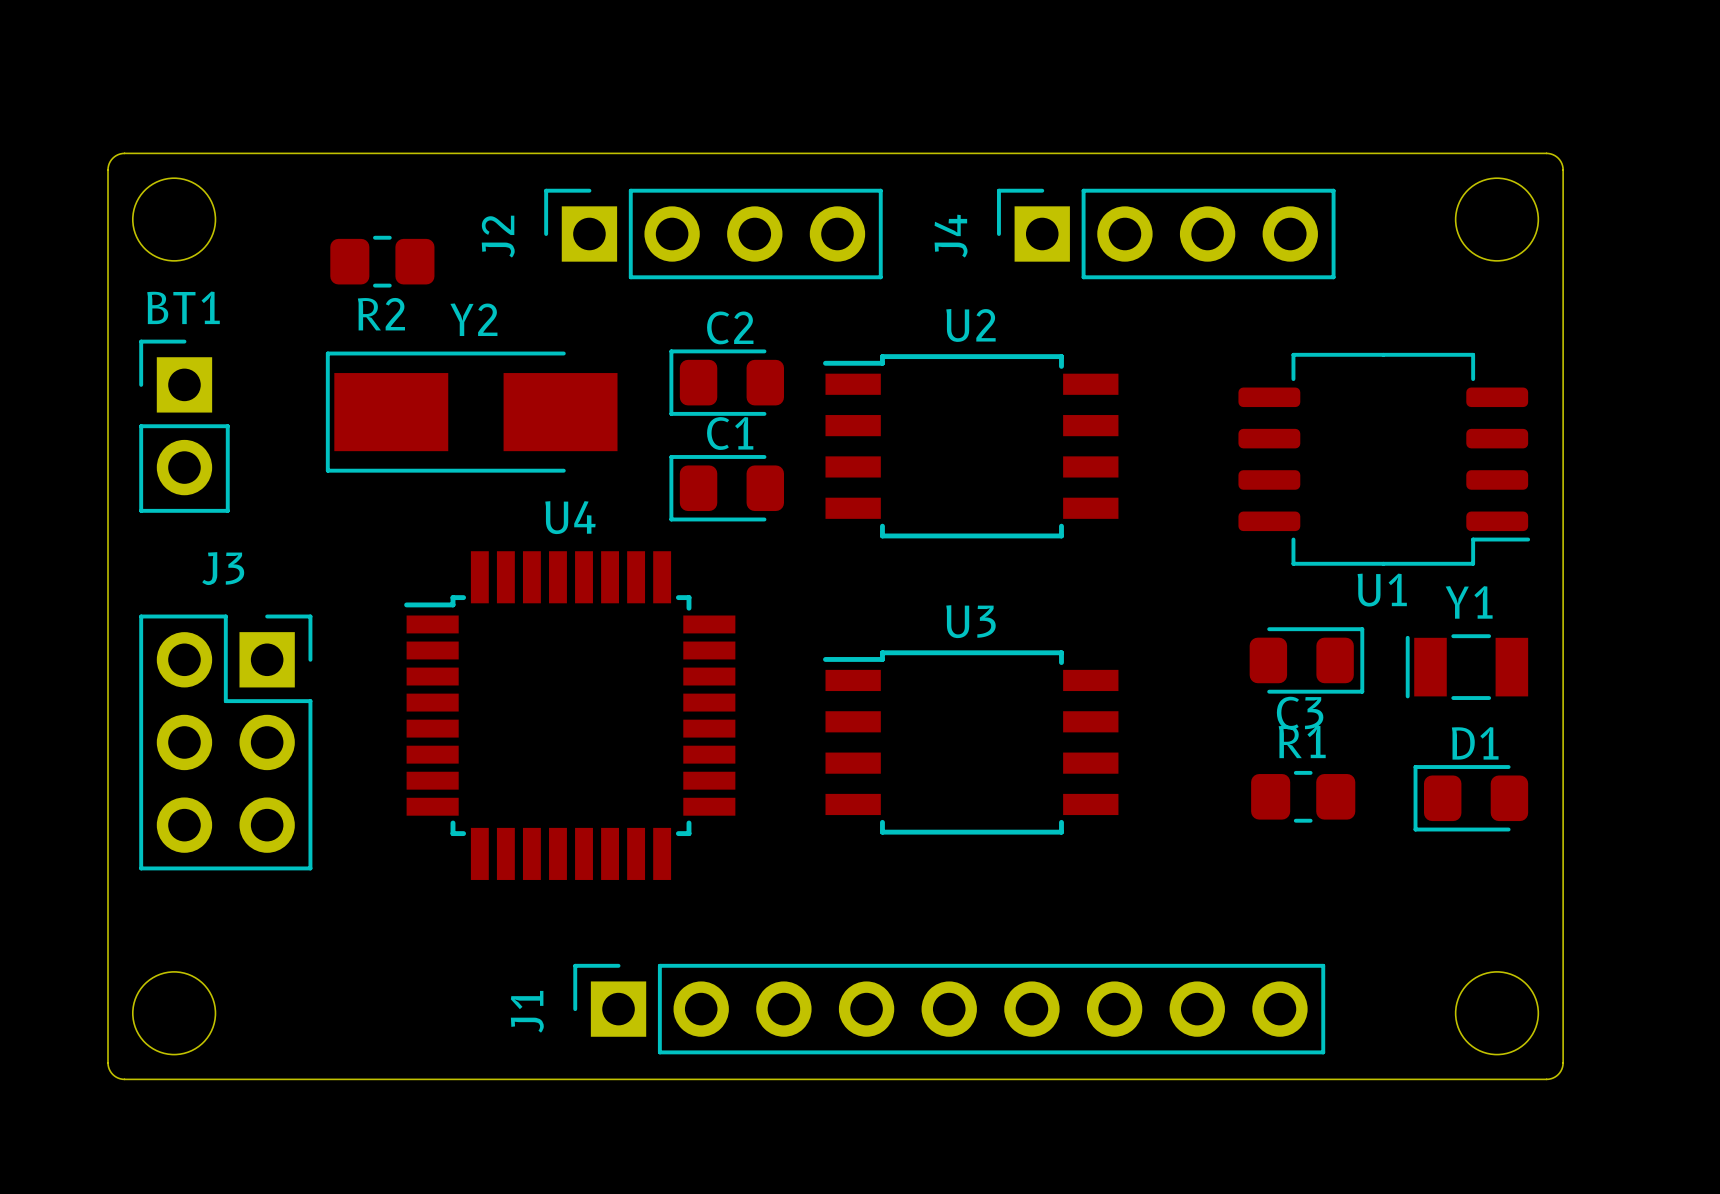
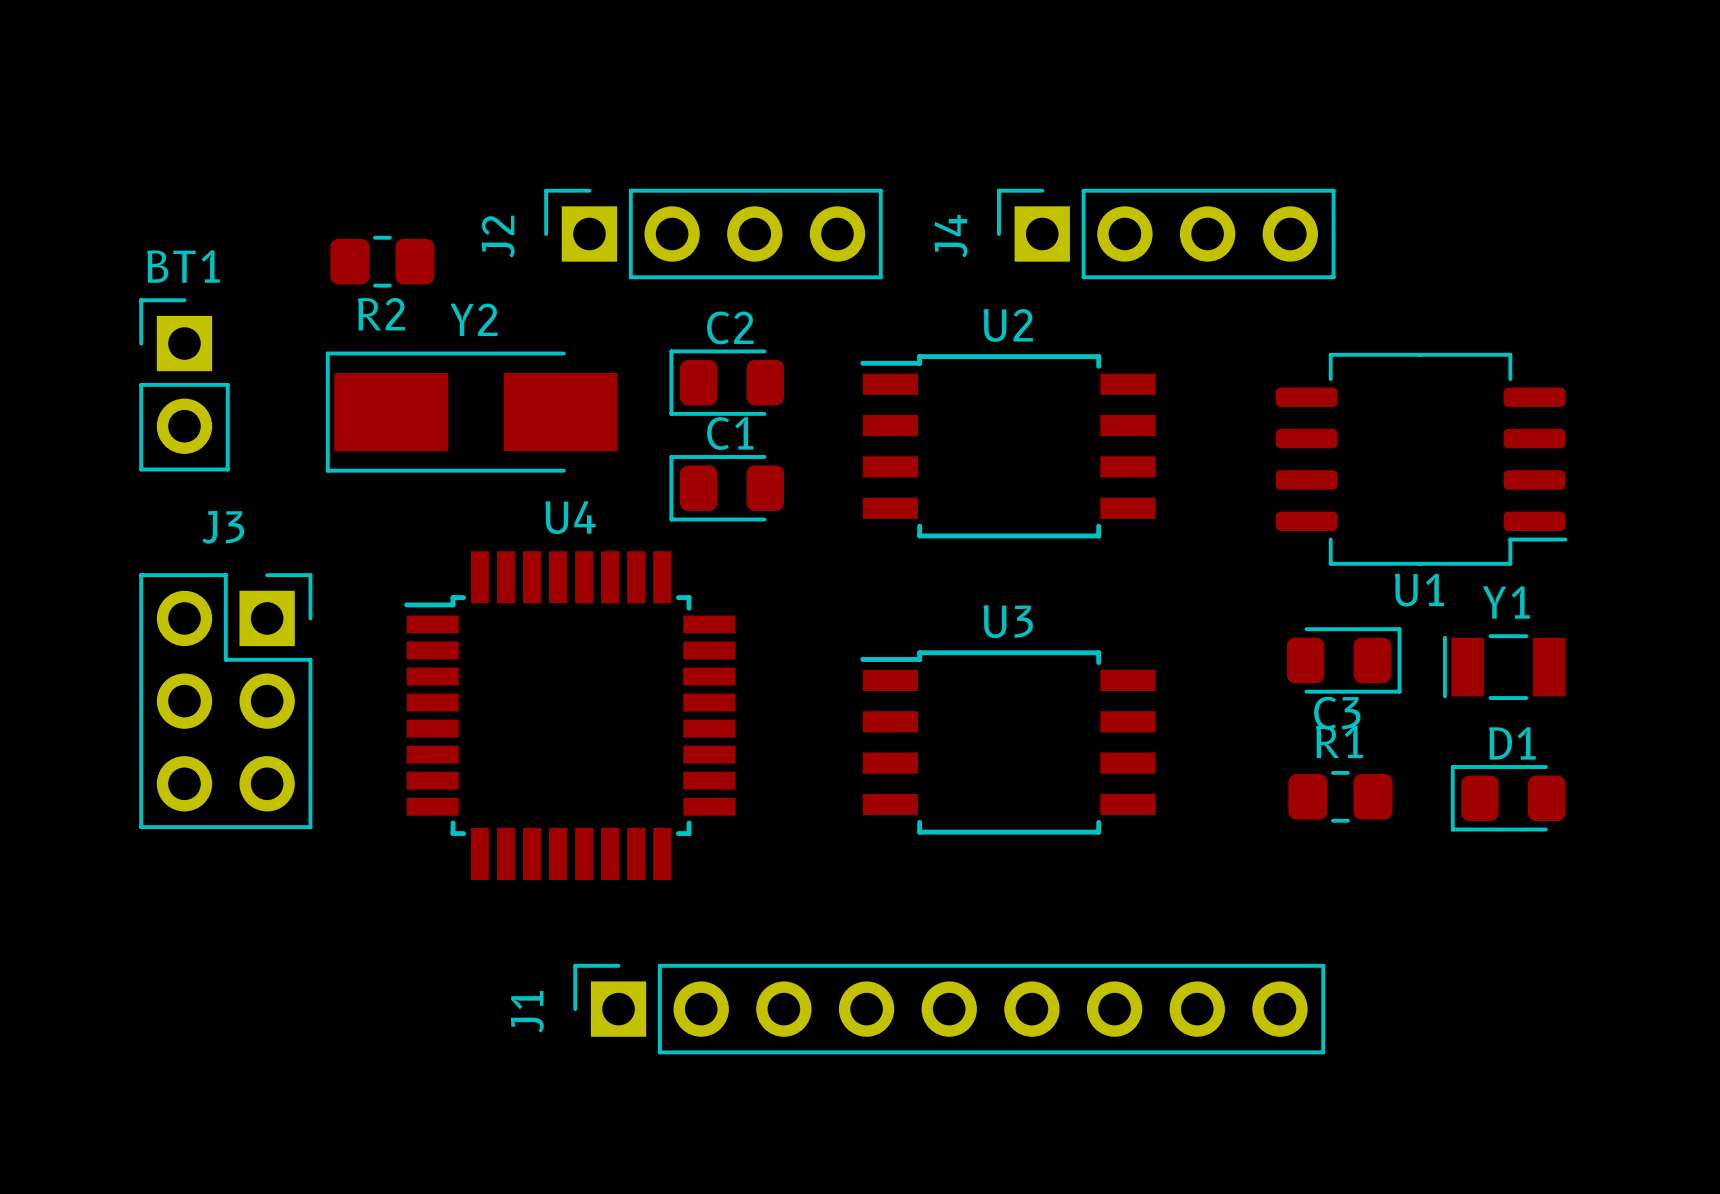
board edge: (124, 153) (1546, 153) (1554, 155) (1560, 161) (1563, 169) (1563, 1062) (1560, 1071) (1554, 1077) (1546, 1079) (124, 1079) (116, 1077) (110, 1071) (107, 1062) (107, 169) (112, 158) (124, 153) -> none
round board edge: [131, 177, 217, 262] -> none
round board edge: [1454, 177, 1540, 262] -> none
BT1 position: (184, 426) -> (184, 384)
U2 position: (970, 446) -> (1007, 446)
U1 position: (1384, 459) -> (1421, 459)
C3 position: (1306, 660) -> (1344, 660)
Y1 position: (1466, 667) -> (1504, 667)
J3 position: (225, 742) -> (225, 701)
U3 position: (970, 742) -> (1007, 742)
R1 position: (1303, 796) -> (1340, 796)
D1 position: (1470, 798) -> (1508, 798)
round board edge: [131, 971, 217, 1056] -> none
round board edge: [1454, 971, 1540, 1056] -> none

